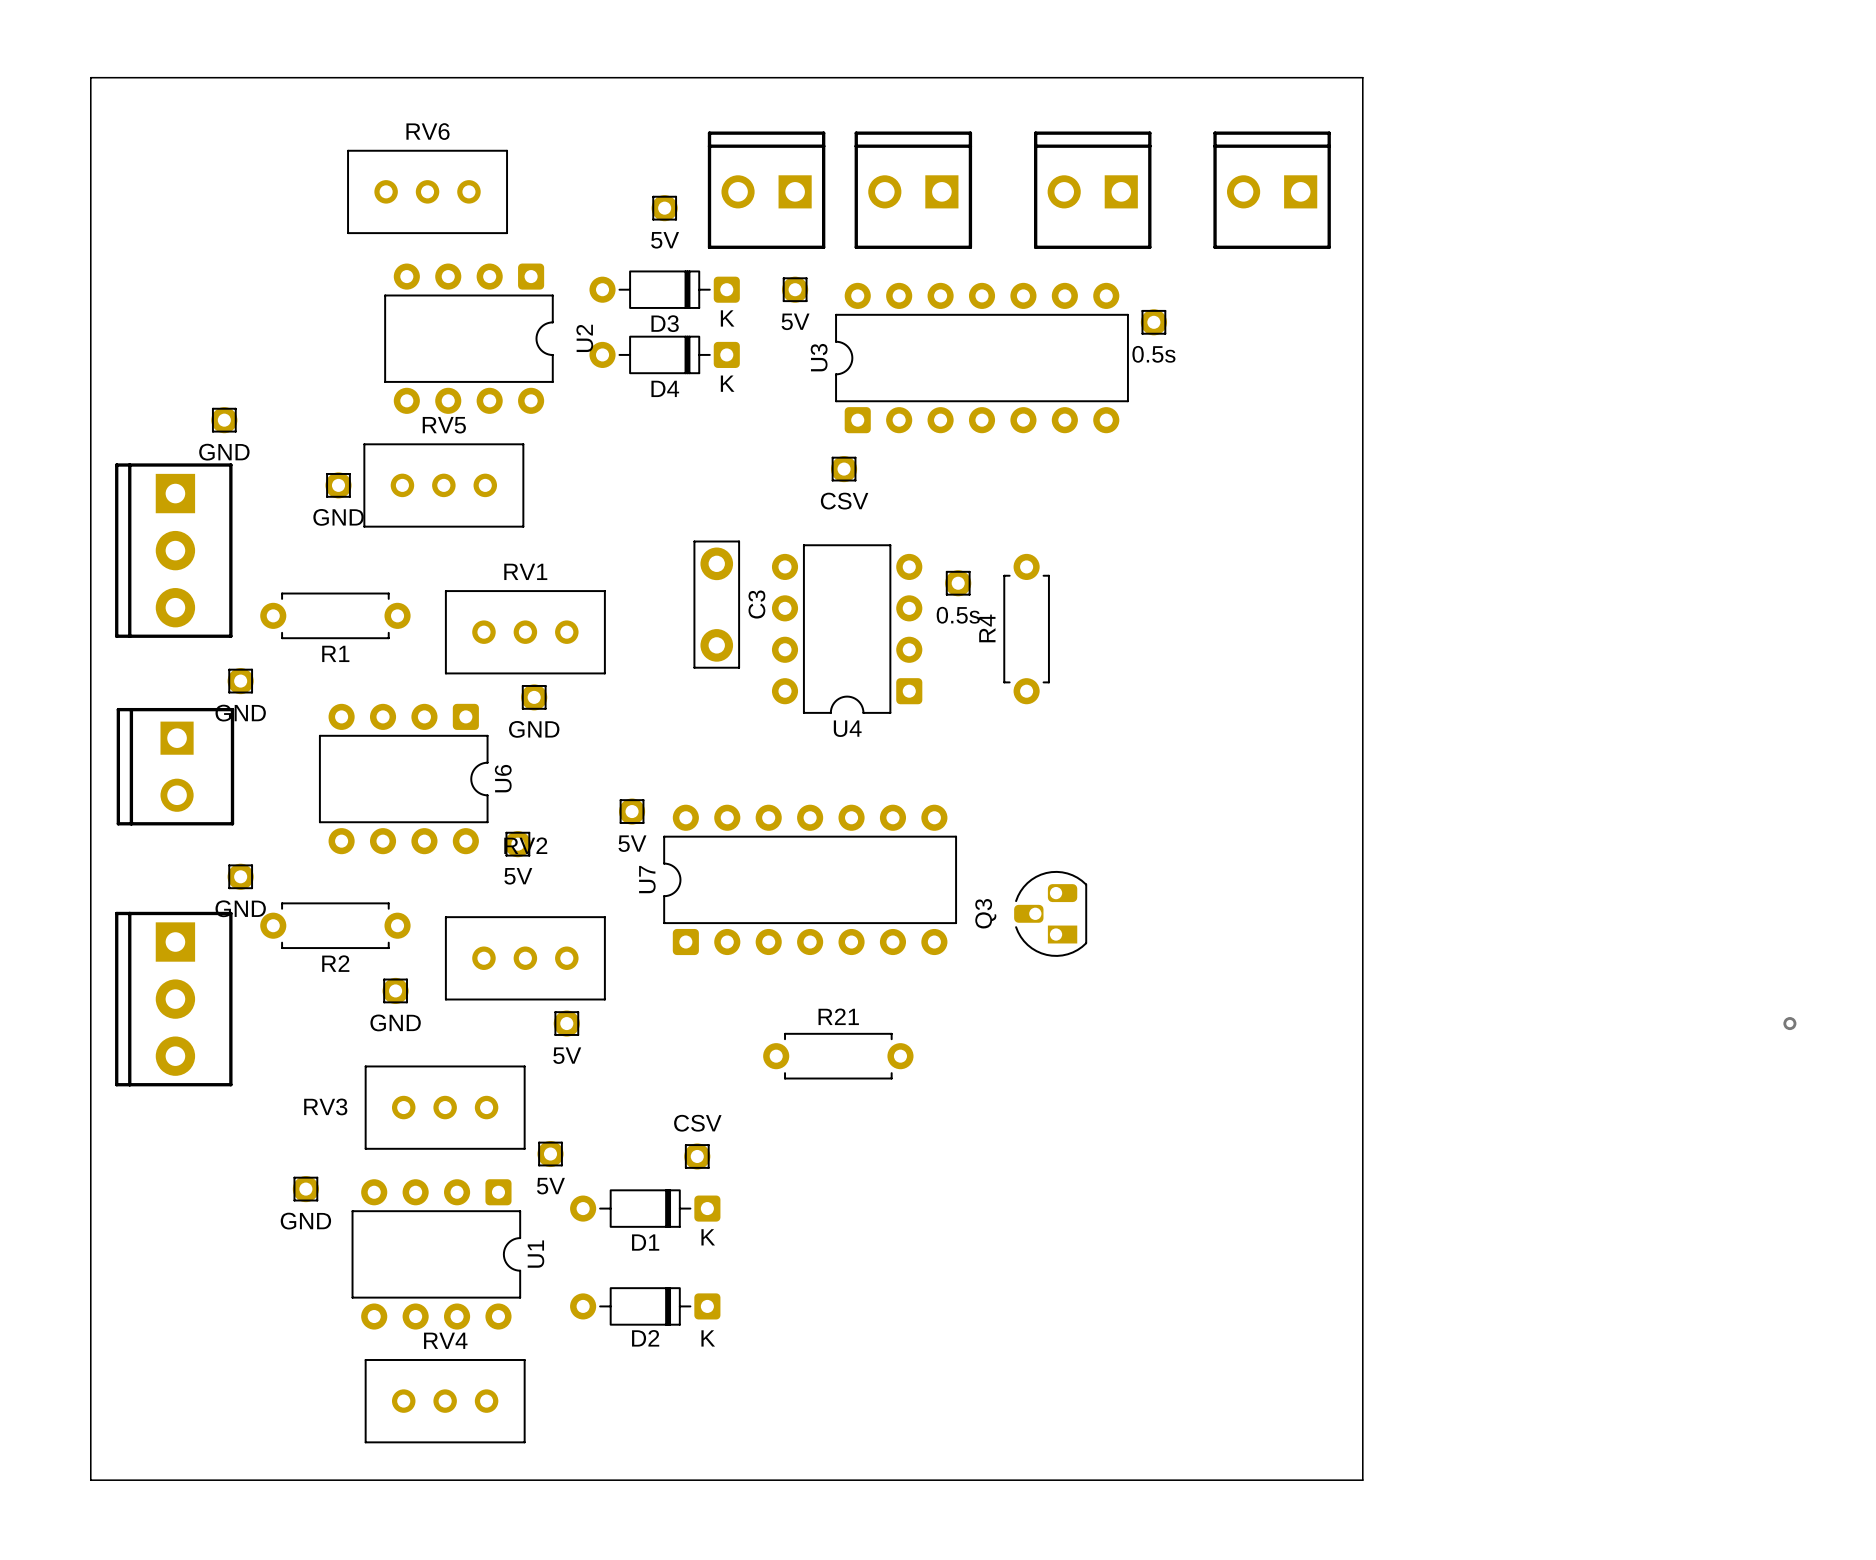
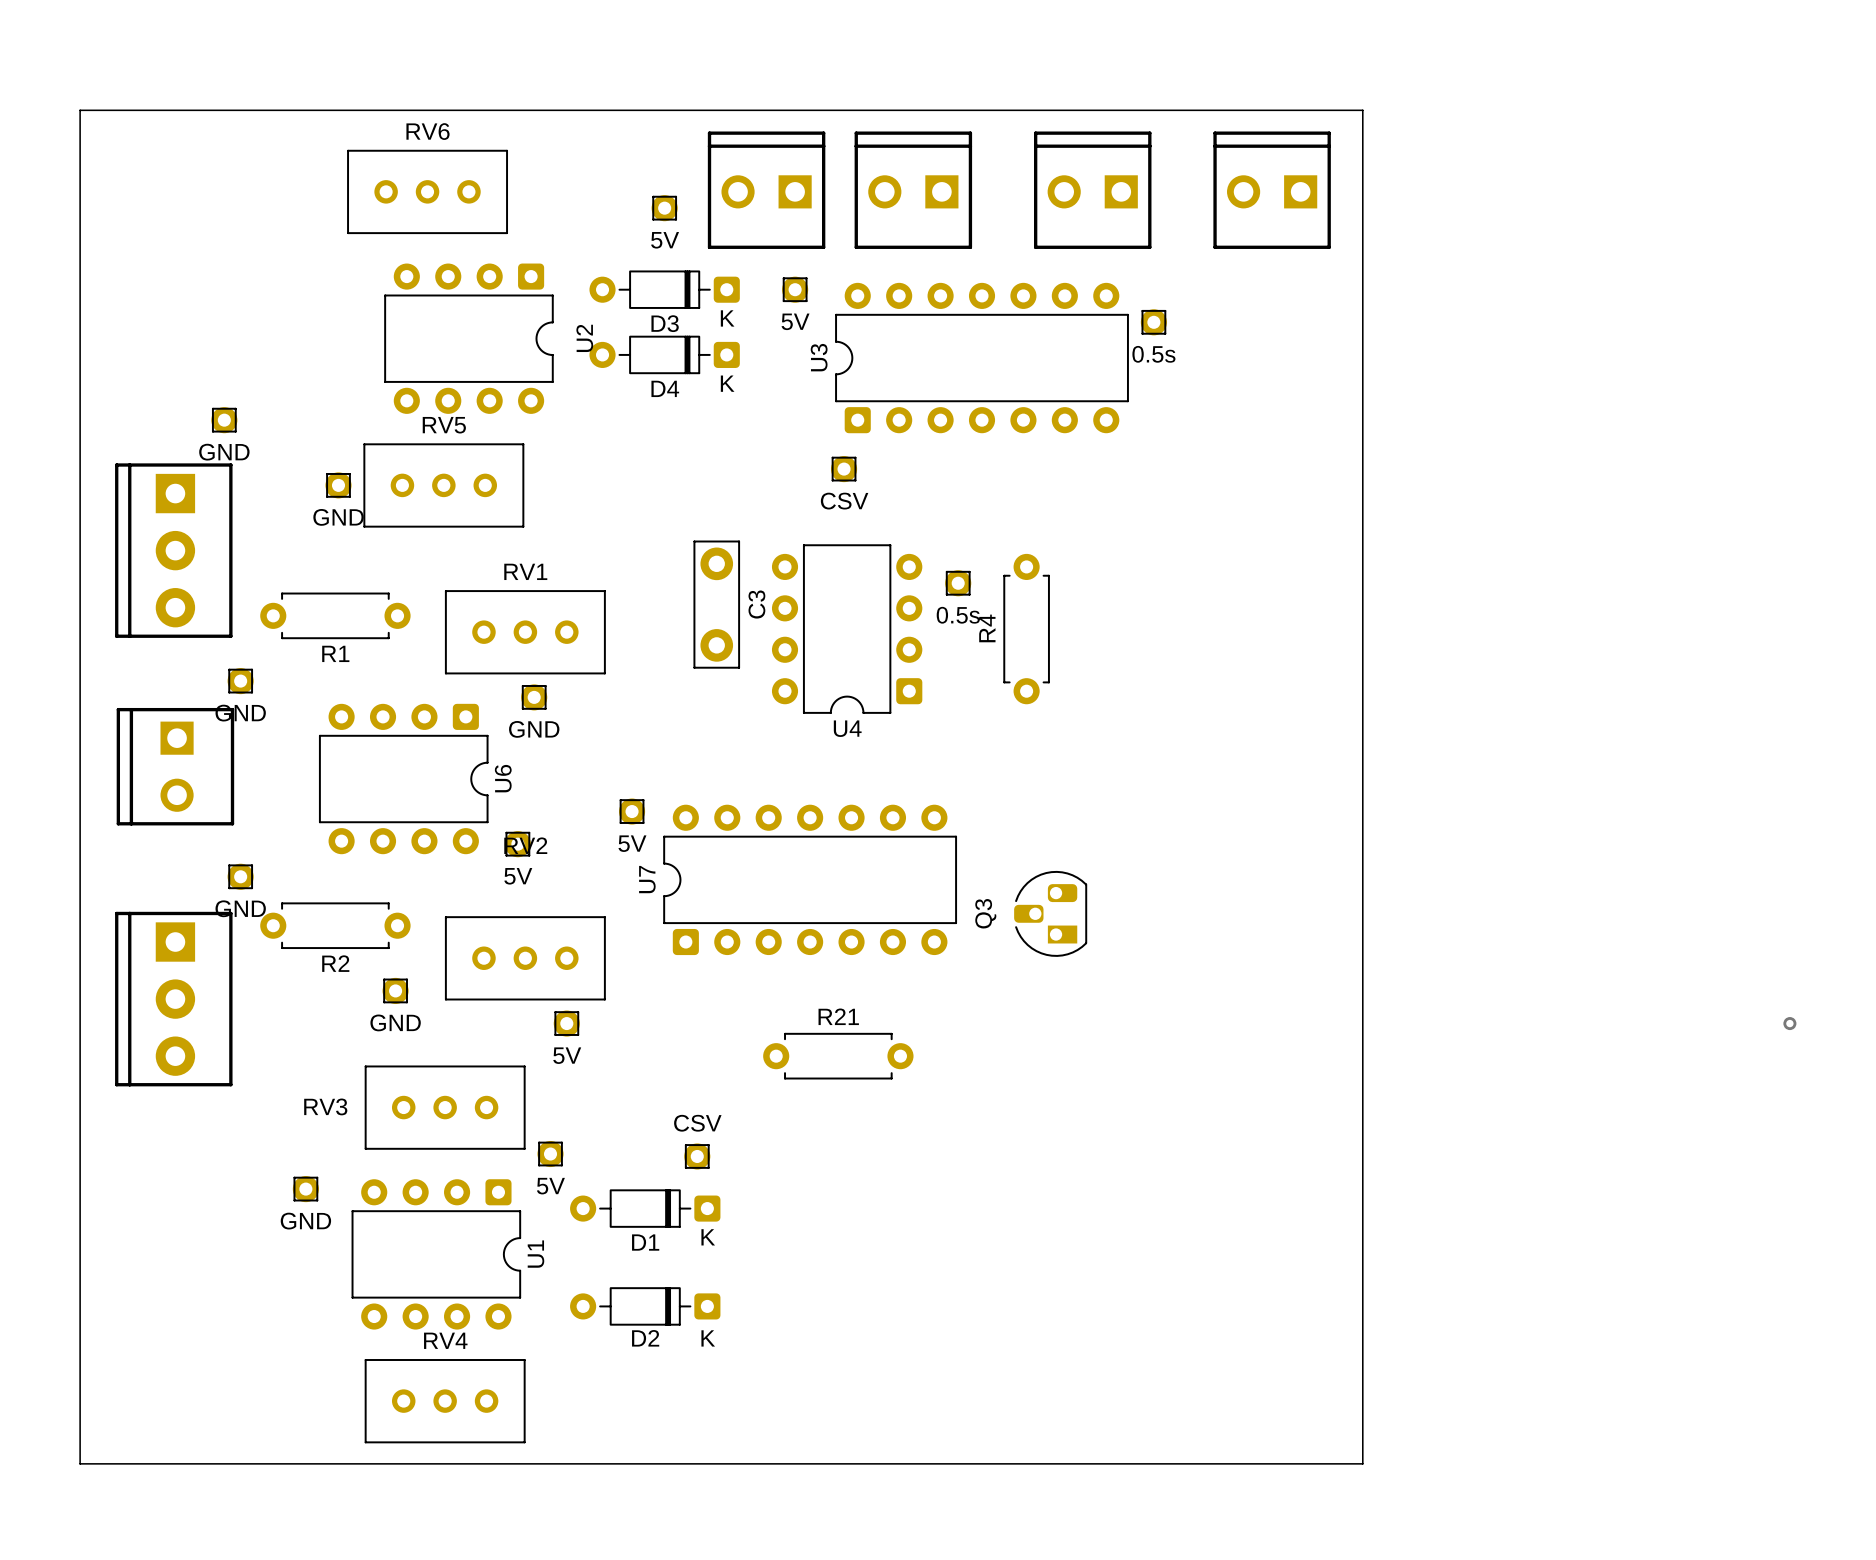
board edge: (1362, 110) (1362, 77) (90, 77) (90, 1480) (1362, 1480) (1362, 1463) -> (1362, 110) (80, 110) (80, 1463) (1362, 1463)

